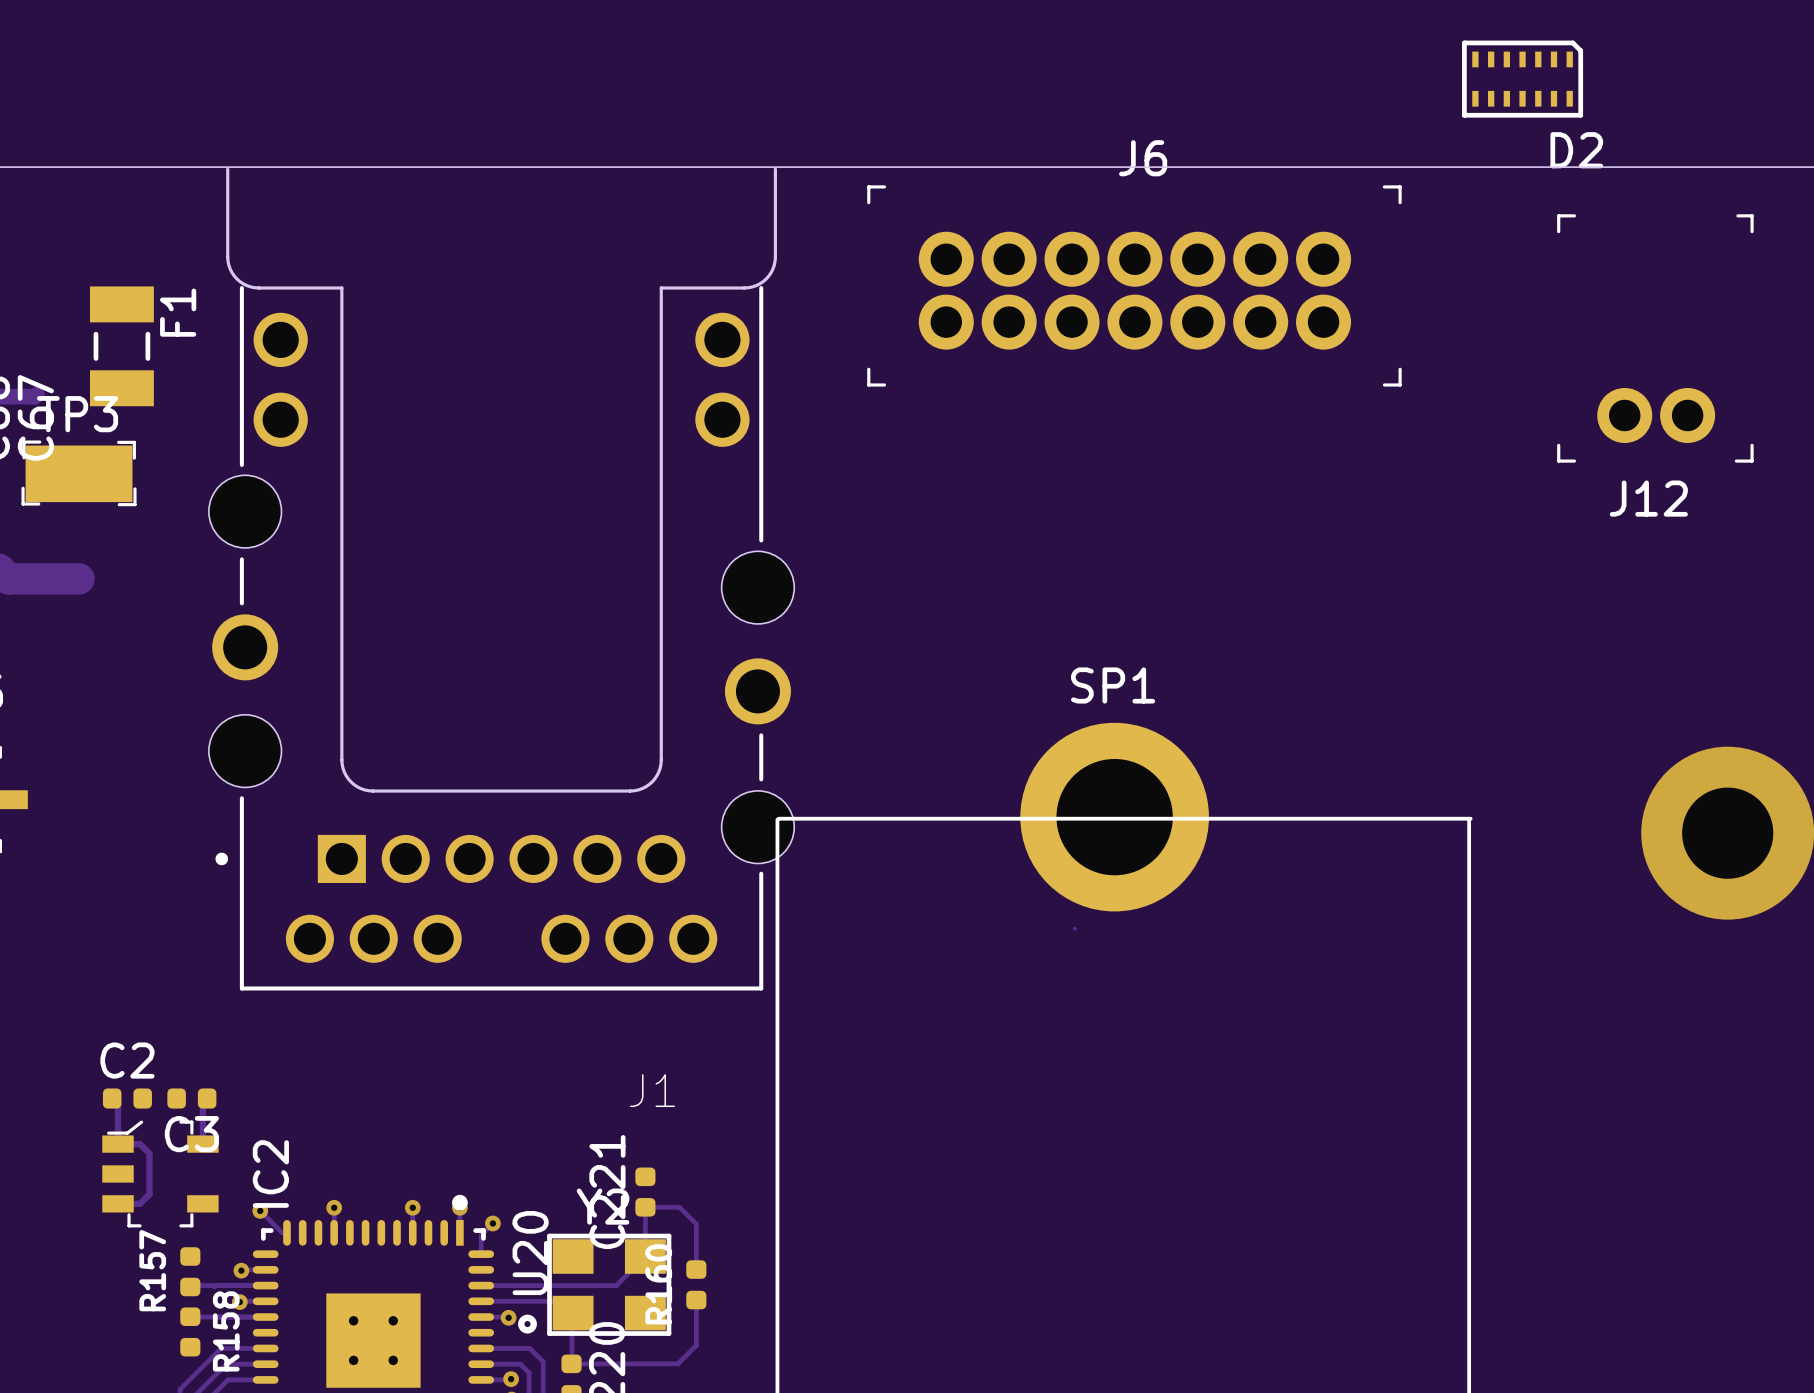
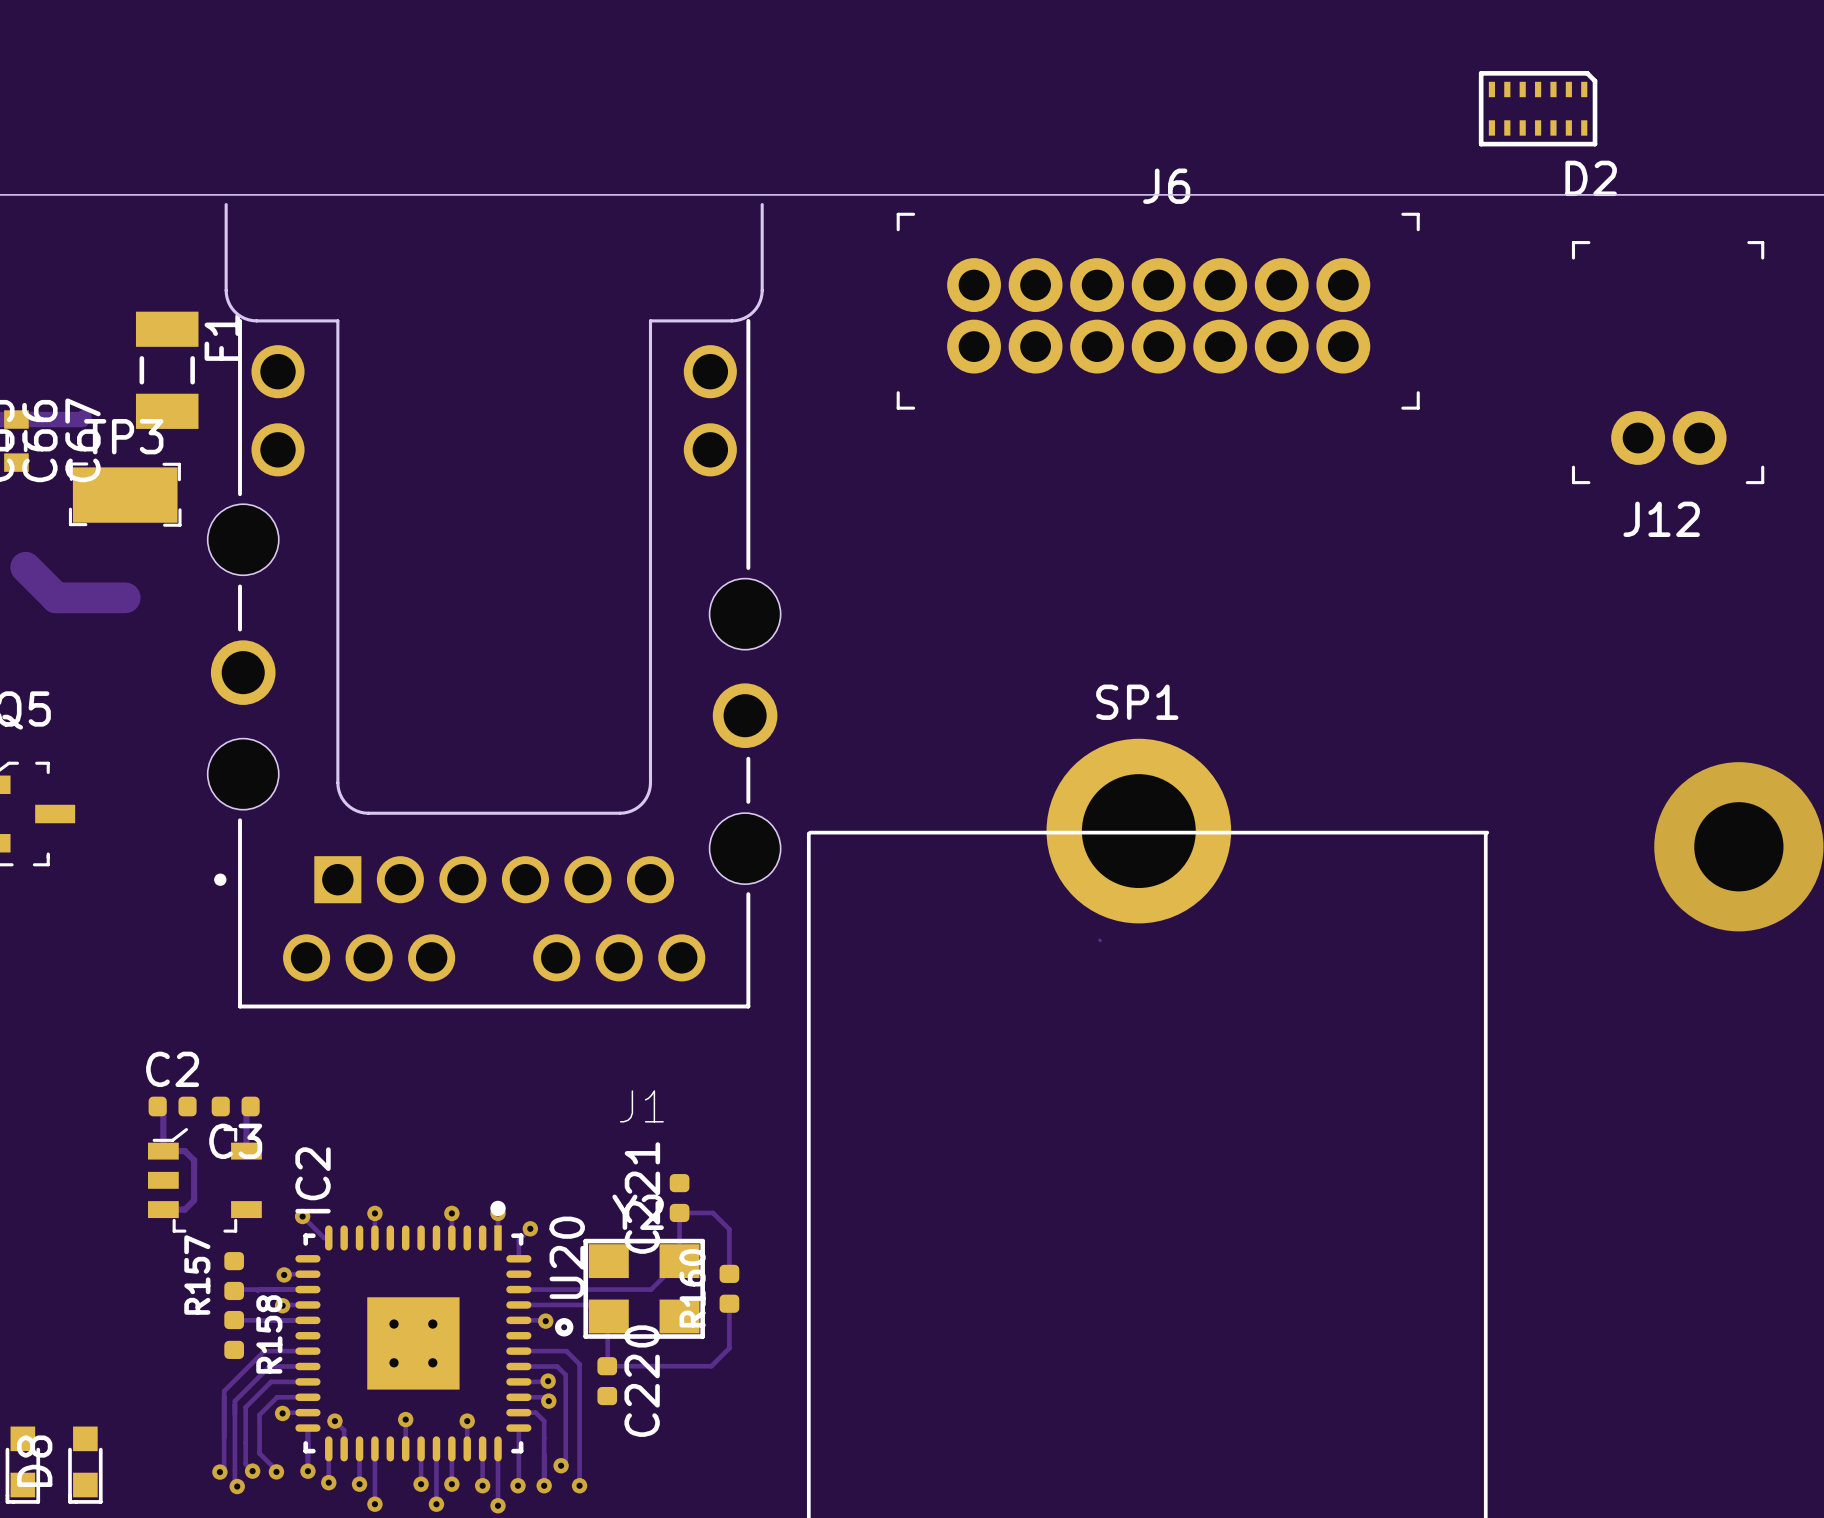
J1 position: (501, 579) -> (494, 605)

